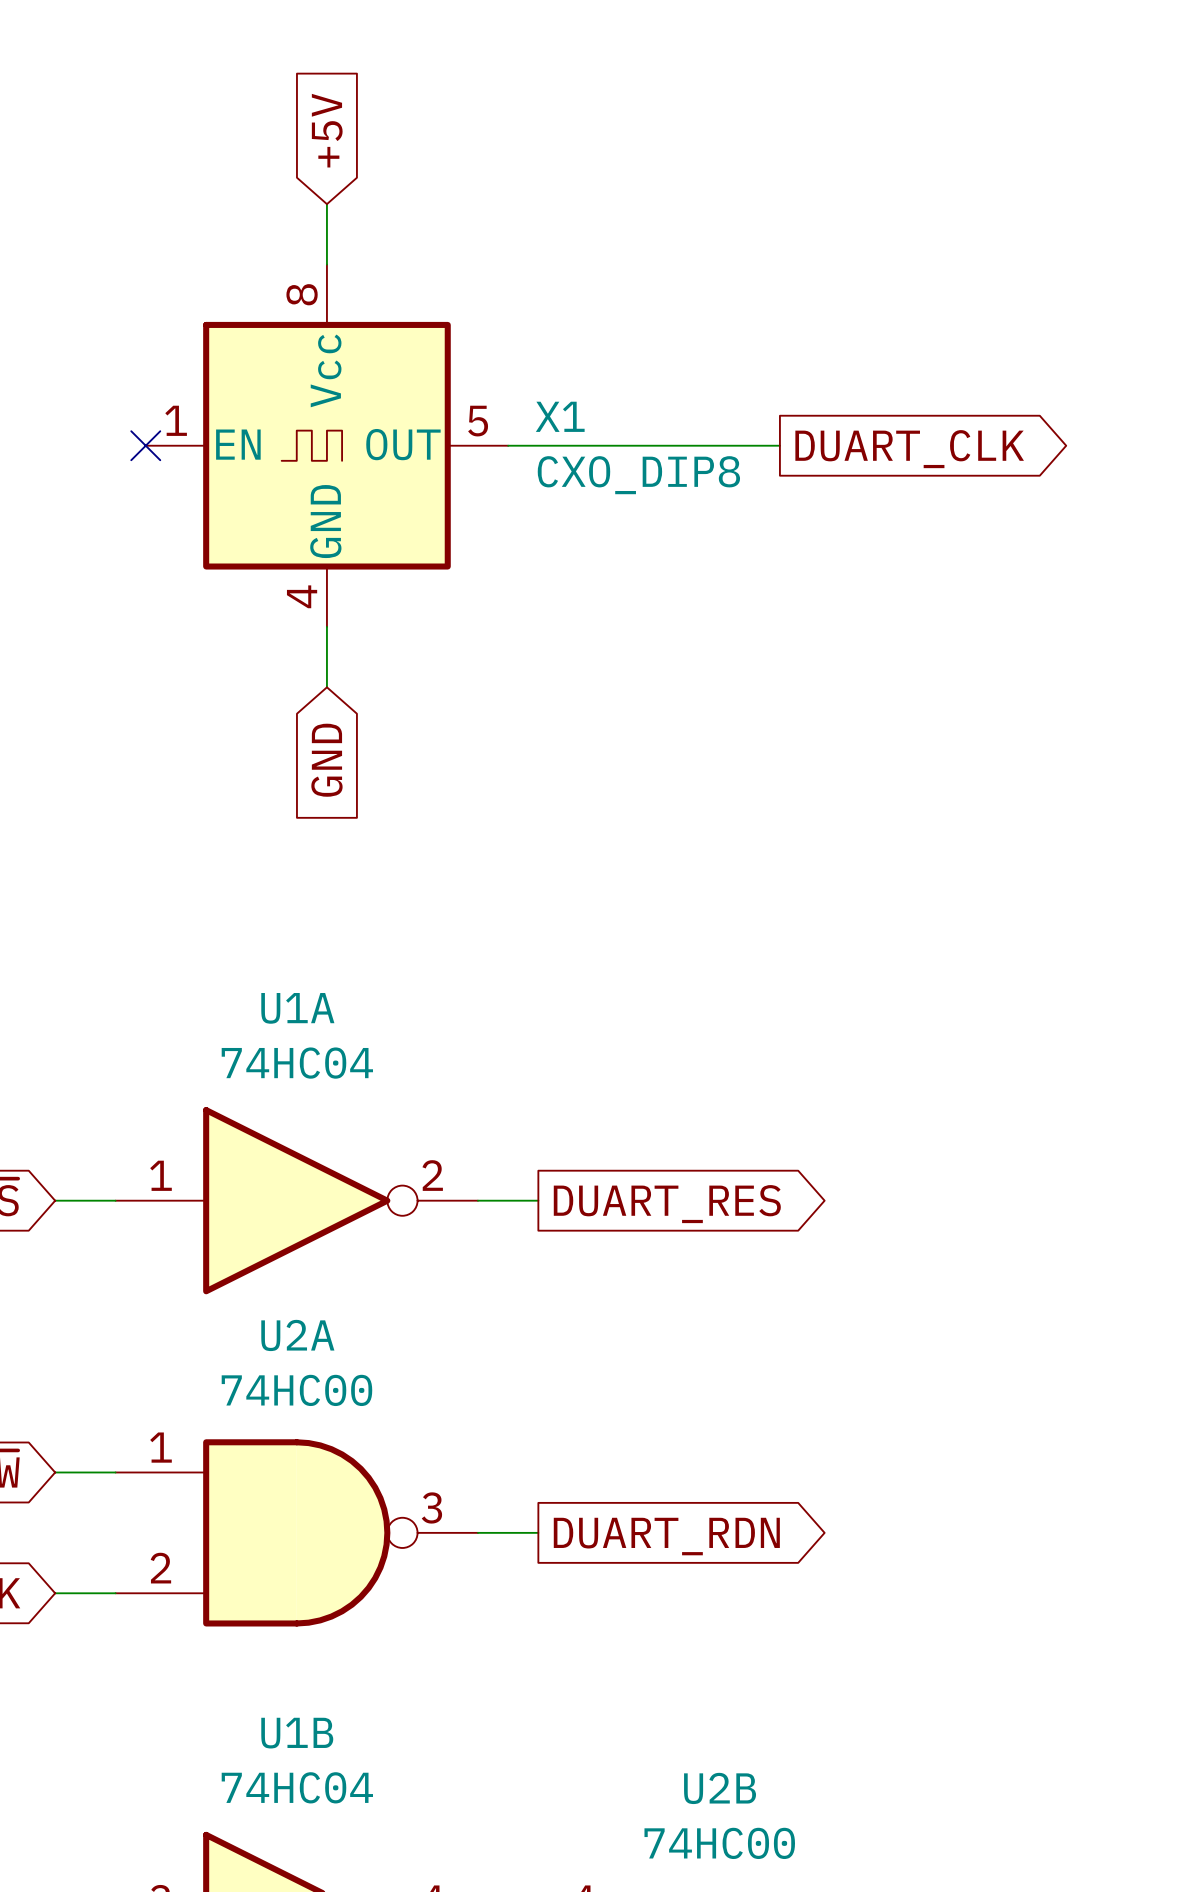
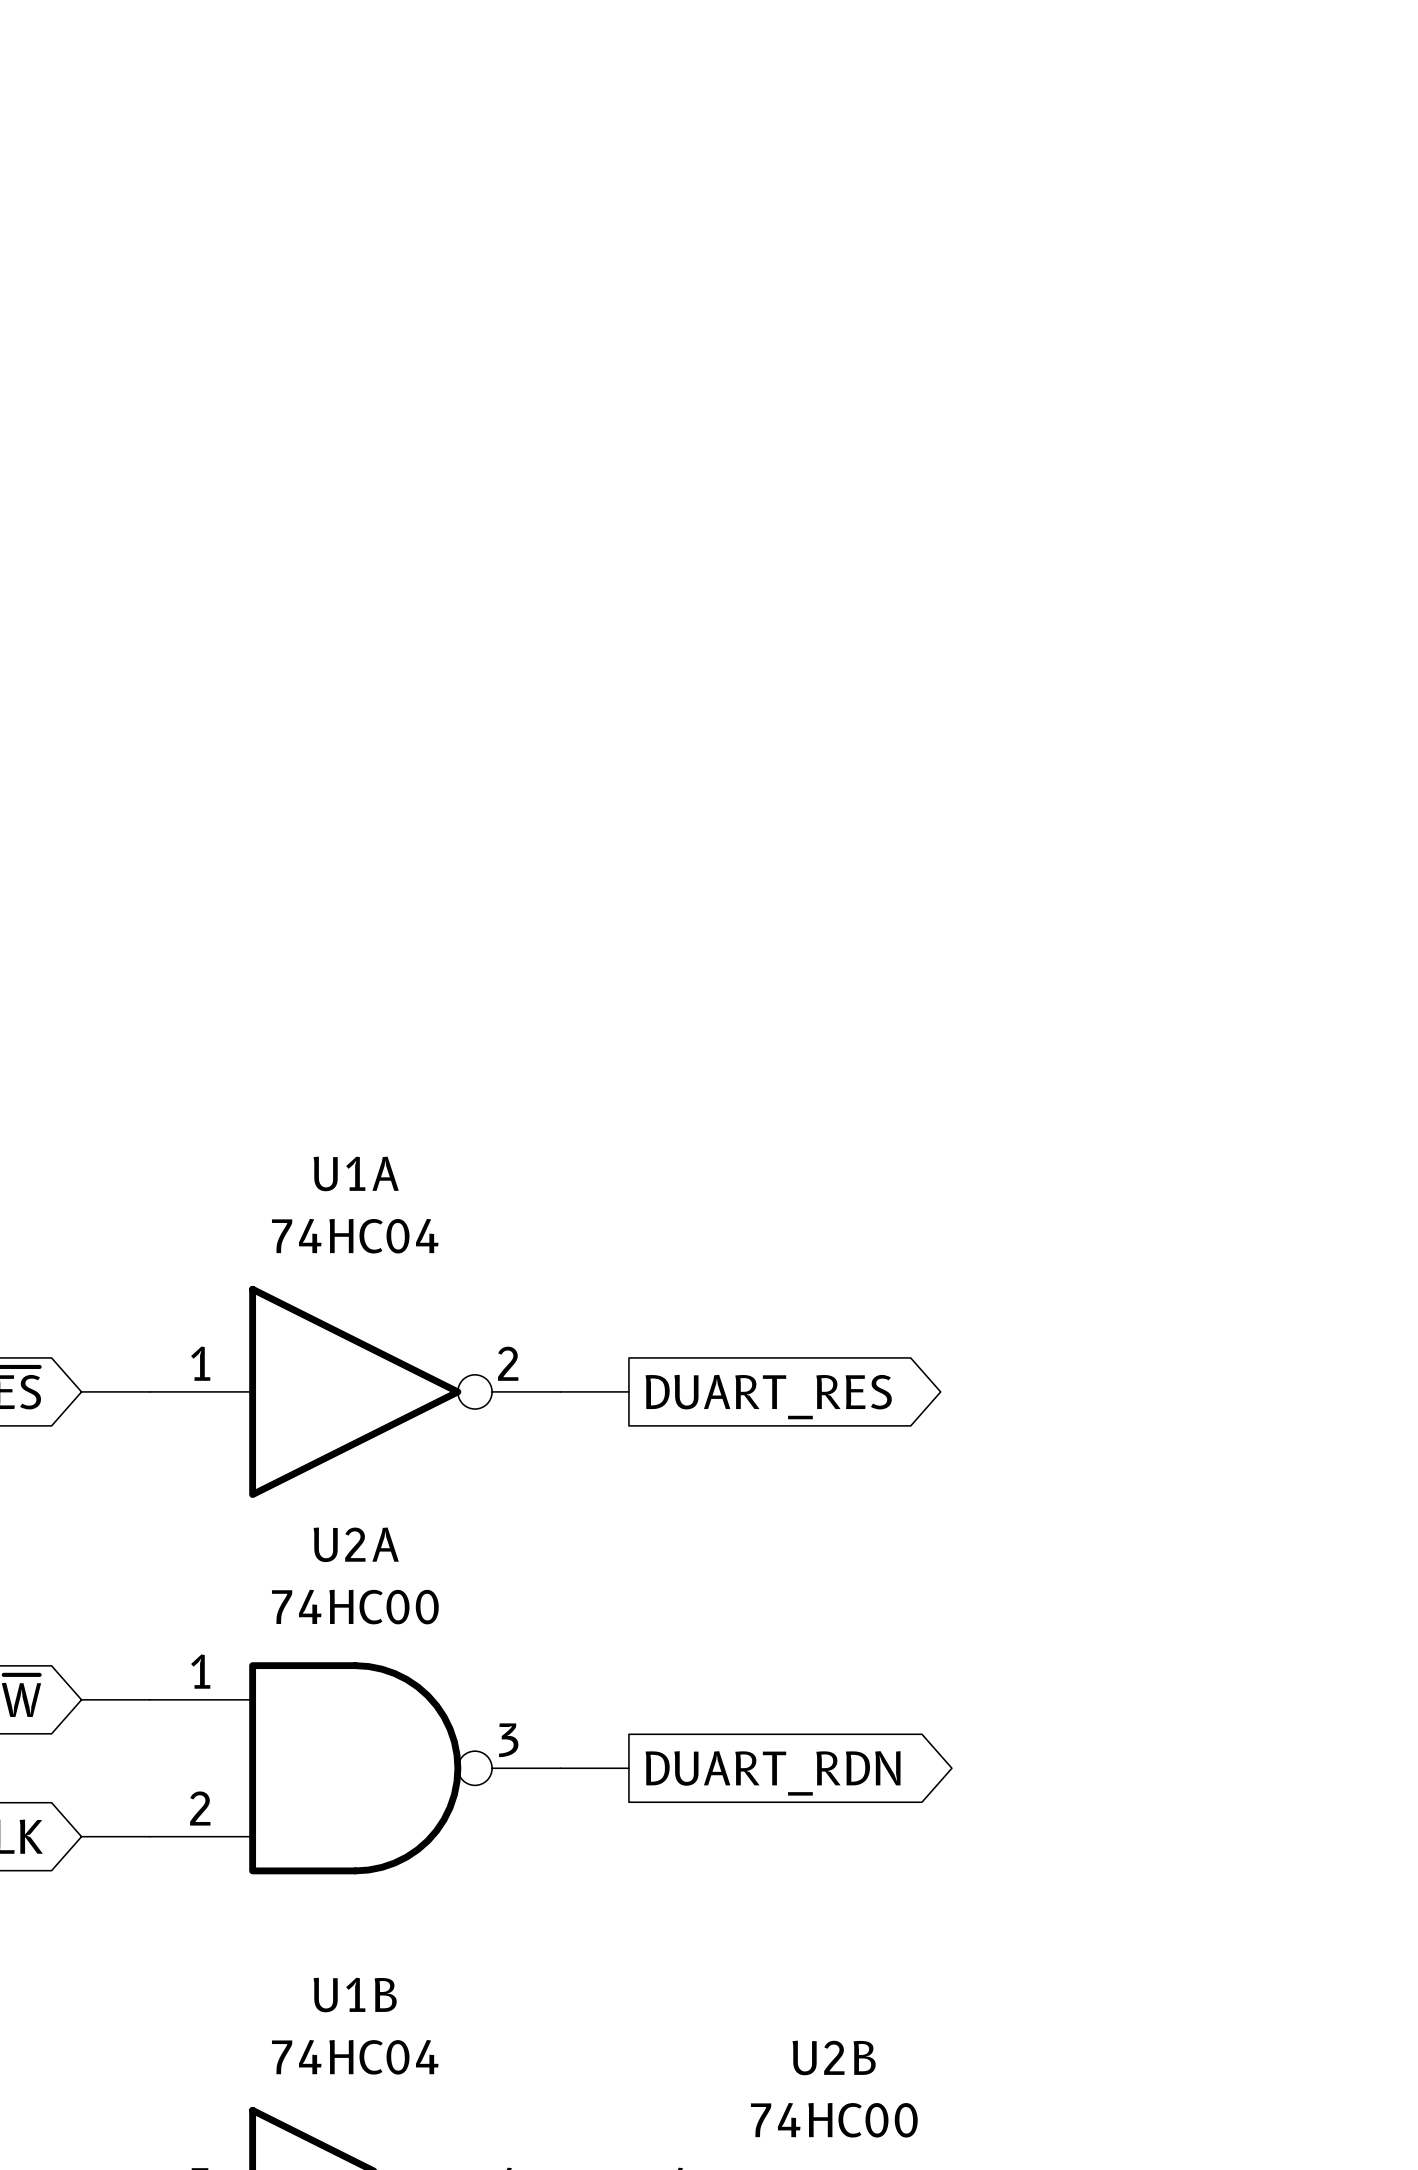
global label: +5V (327, 130) -> none
wire: (326, 204) (326, 264) -> none
no-connect mark: (145, 445) -> none
X1: CXO_DIP8 (326, 445) -> none
wire: (508, 445) (779, 445) -> none
global label: DUART_CLK (909, 449) -> none
wire: (326, 626) (326, 687) -> none
global label: GND (326, 760) -> none

